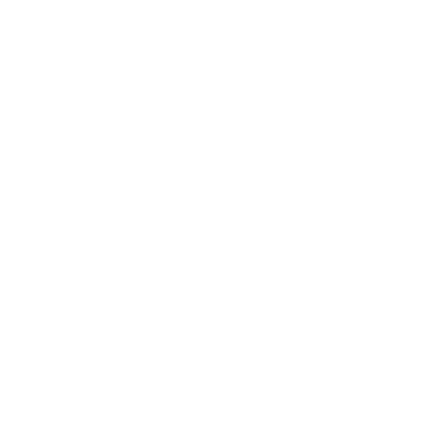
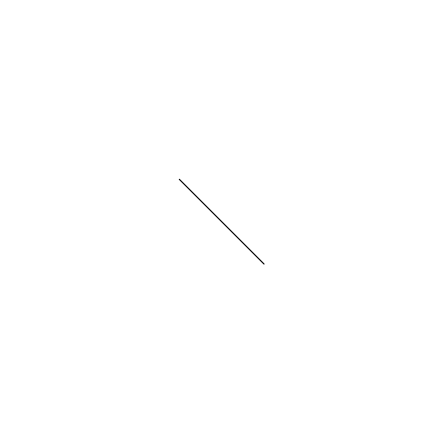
bus: none -> (179, 179) (264, 264)

